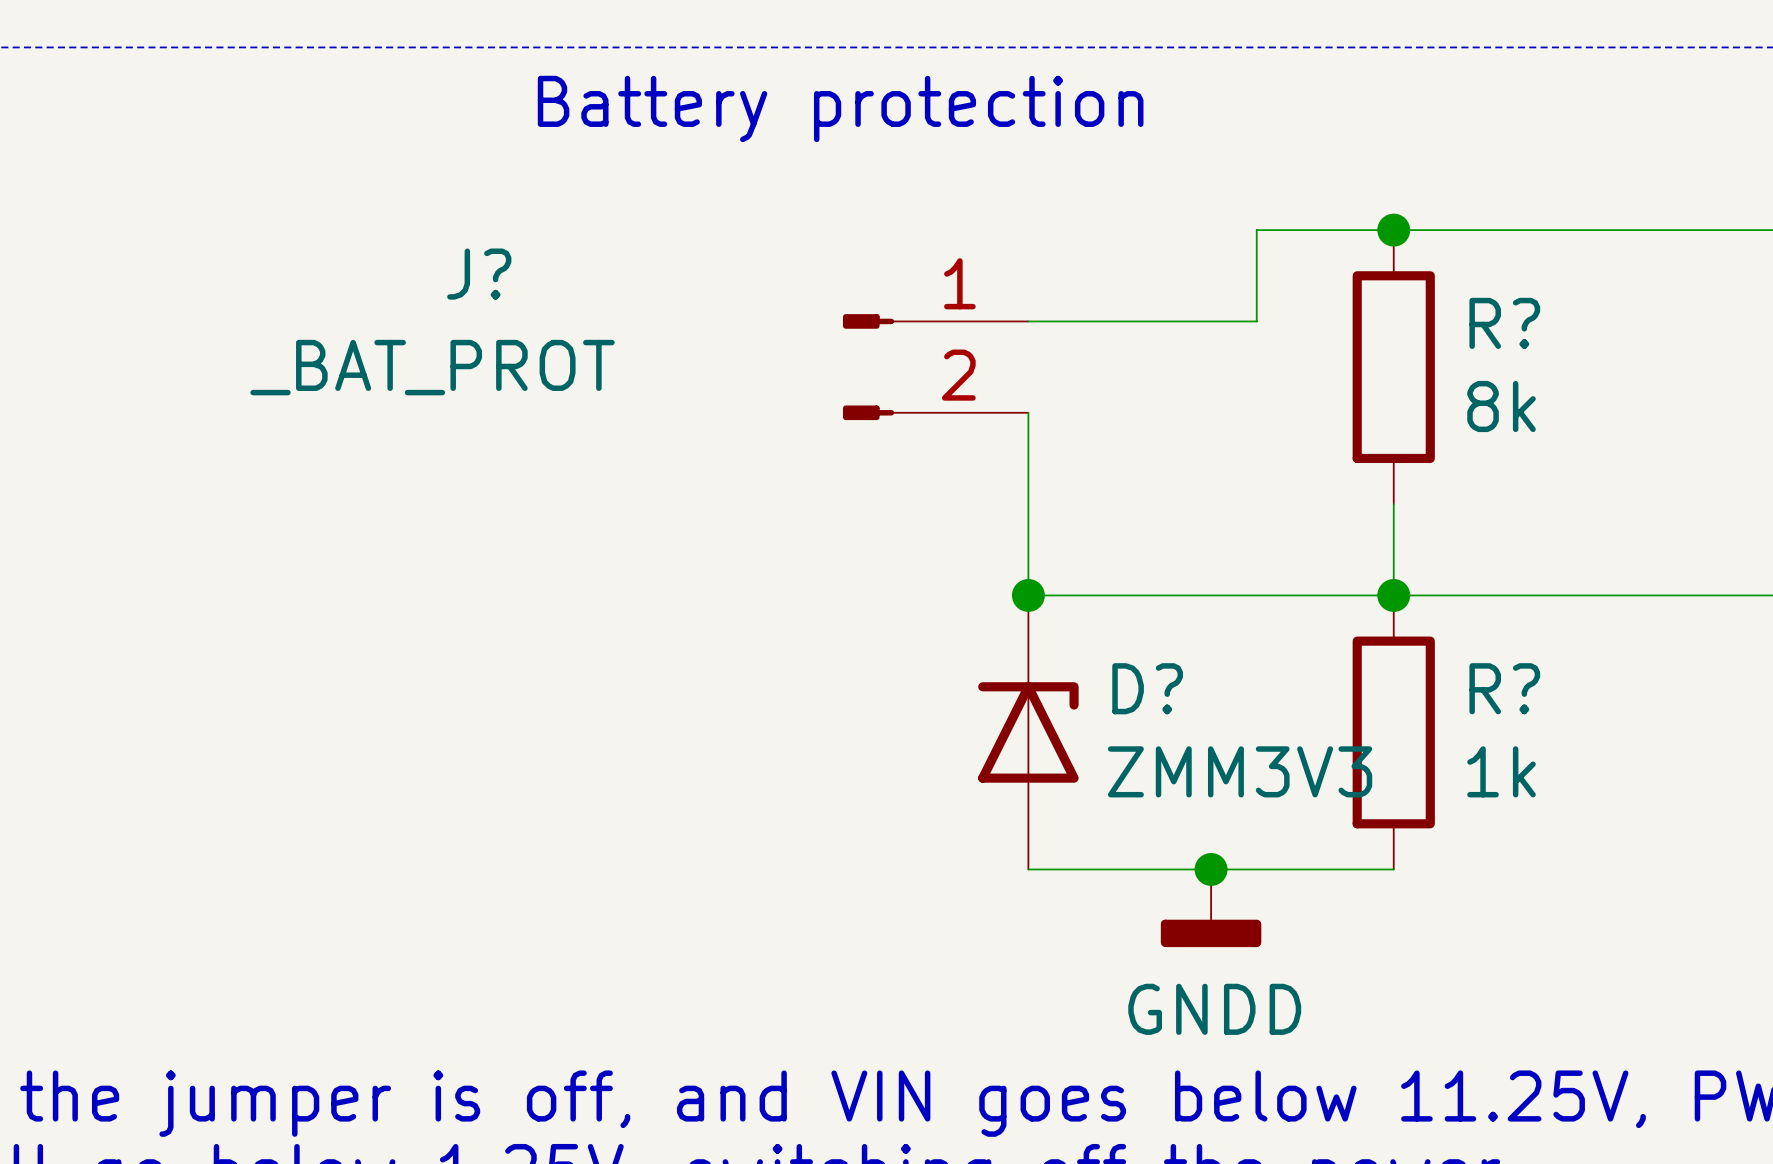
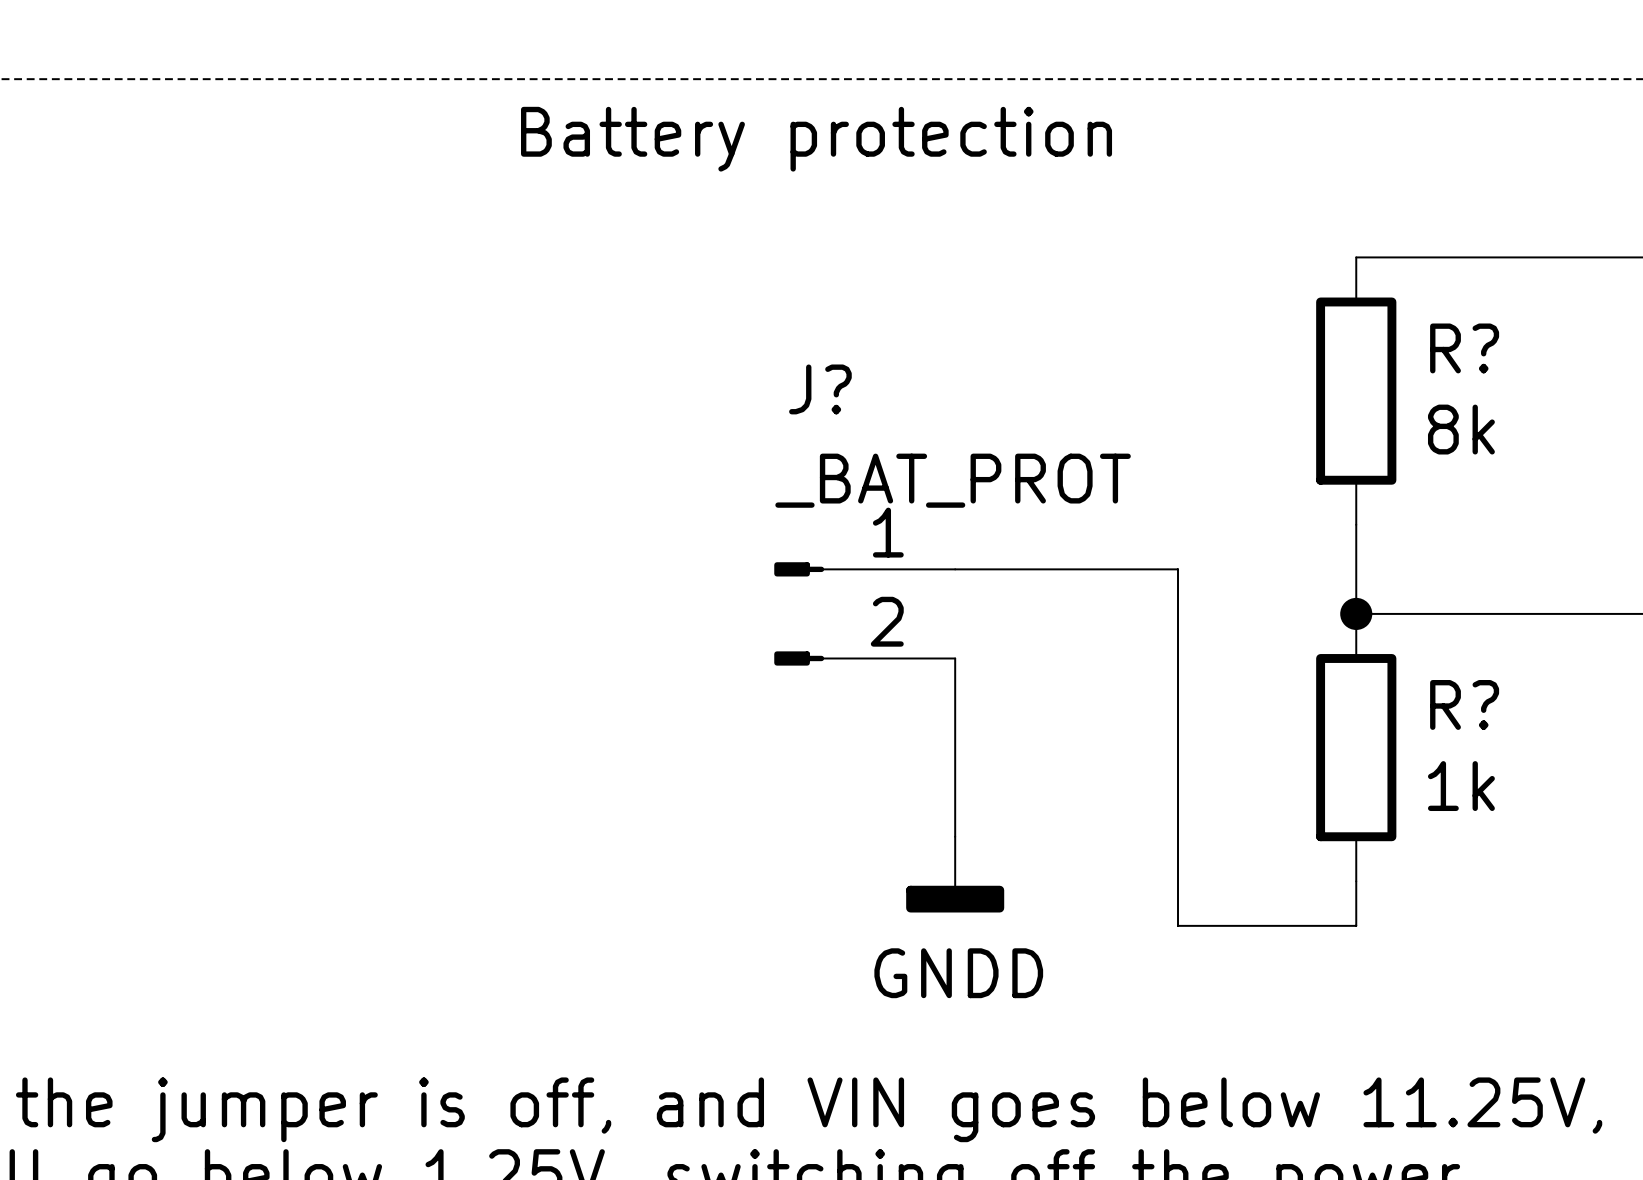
wire: (1393, 230) (1256, 230) (1256, 321) (1028, 321) -> none
junction: (1393, 230) -> none
J? name position: J? (479, 274) -> J? (820, 389)
J? value position: _BAT_PROT (432, 367) -> _BAT_PROT (953, 480)
J? position: (935, 367) -> (864, 613)
wire: (1028, 412) (1028, 595) (1393, 595) -> none
junction: (1028, 595) -> none
wire: none -> (955, 658) (955, 836)
D?: ZMM3V3 (1028, 732) -> none
wire: (1028, 869) (1393, 869) -> (955, 569) (1178, 569) (1178, 925) (1356, 925) (1356, 881)
junction: (1211, 869) -> none
power symbol position: GNDD (1211, 908) -> GNDD (955, 874)

